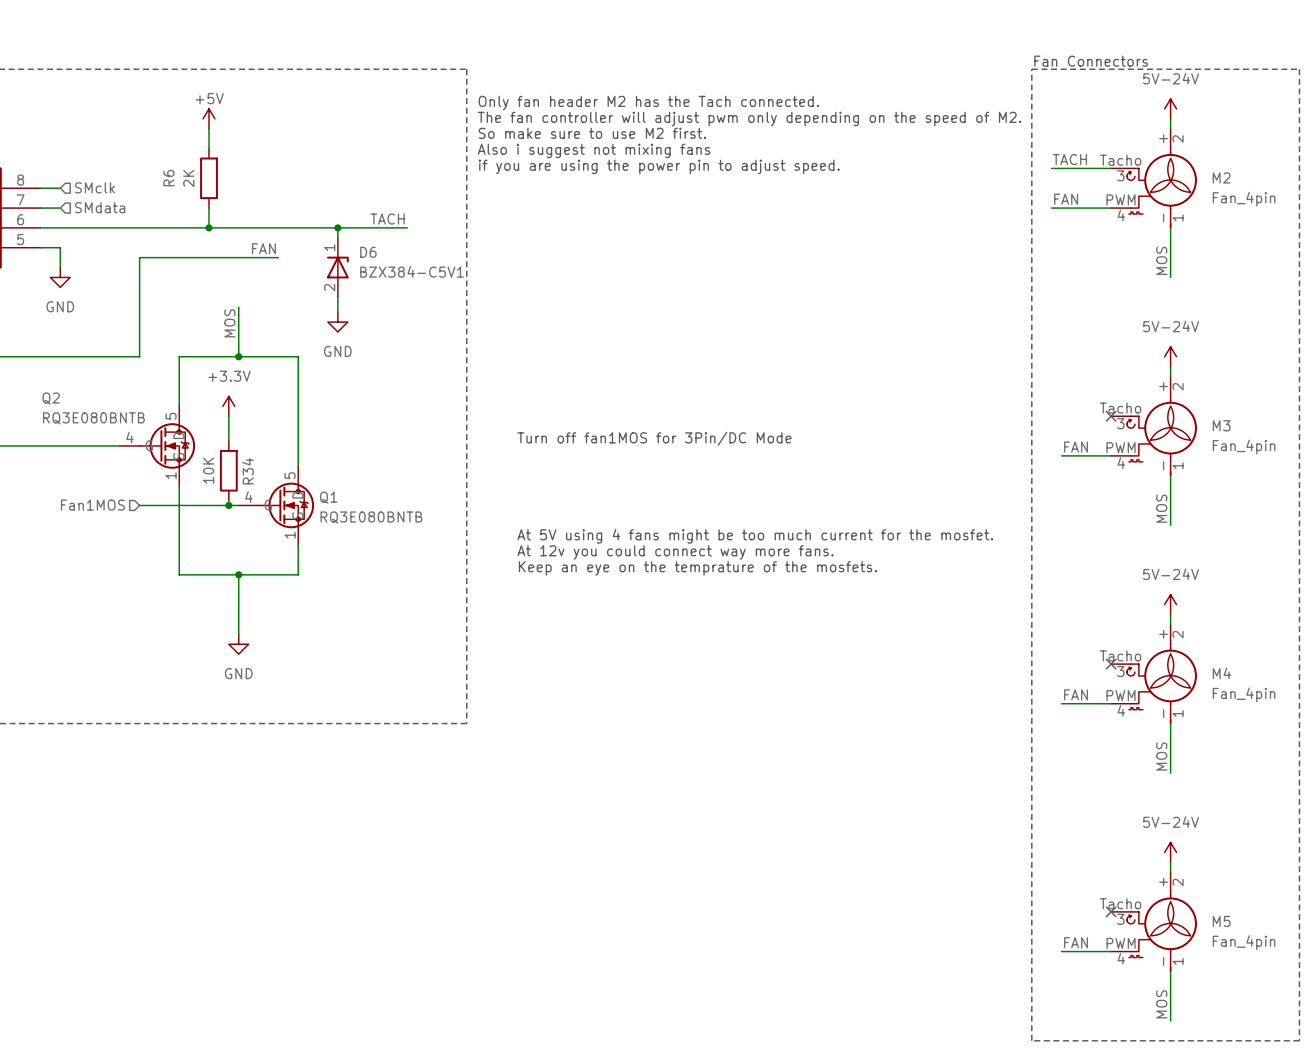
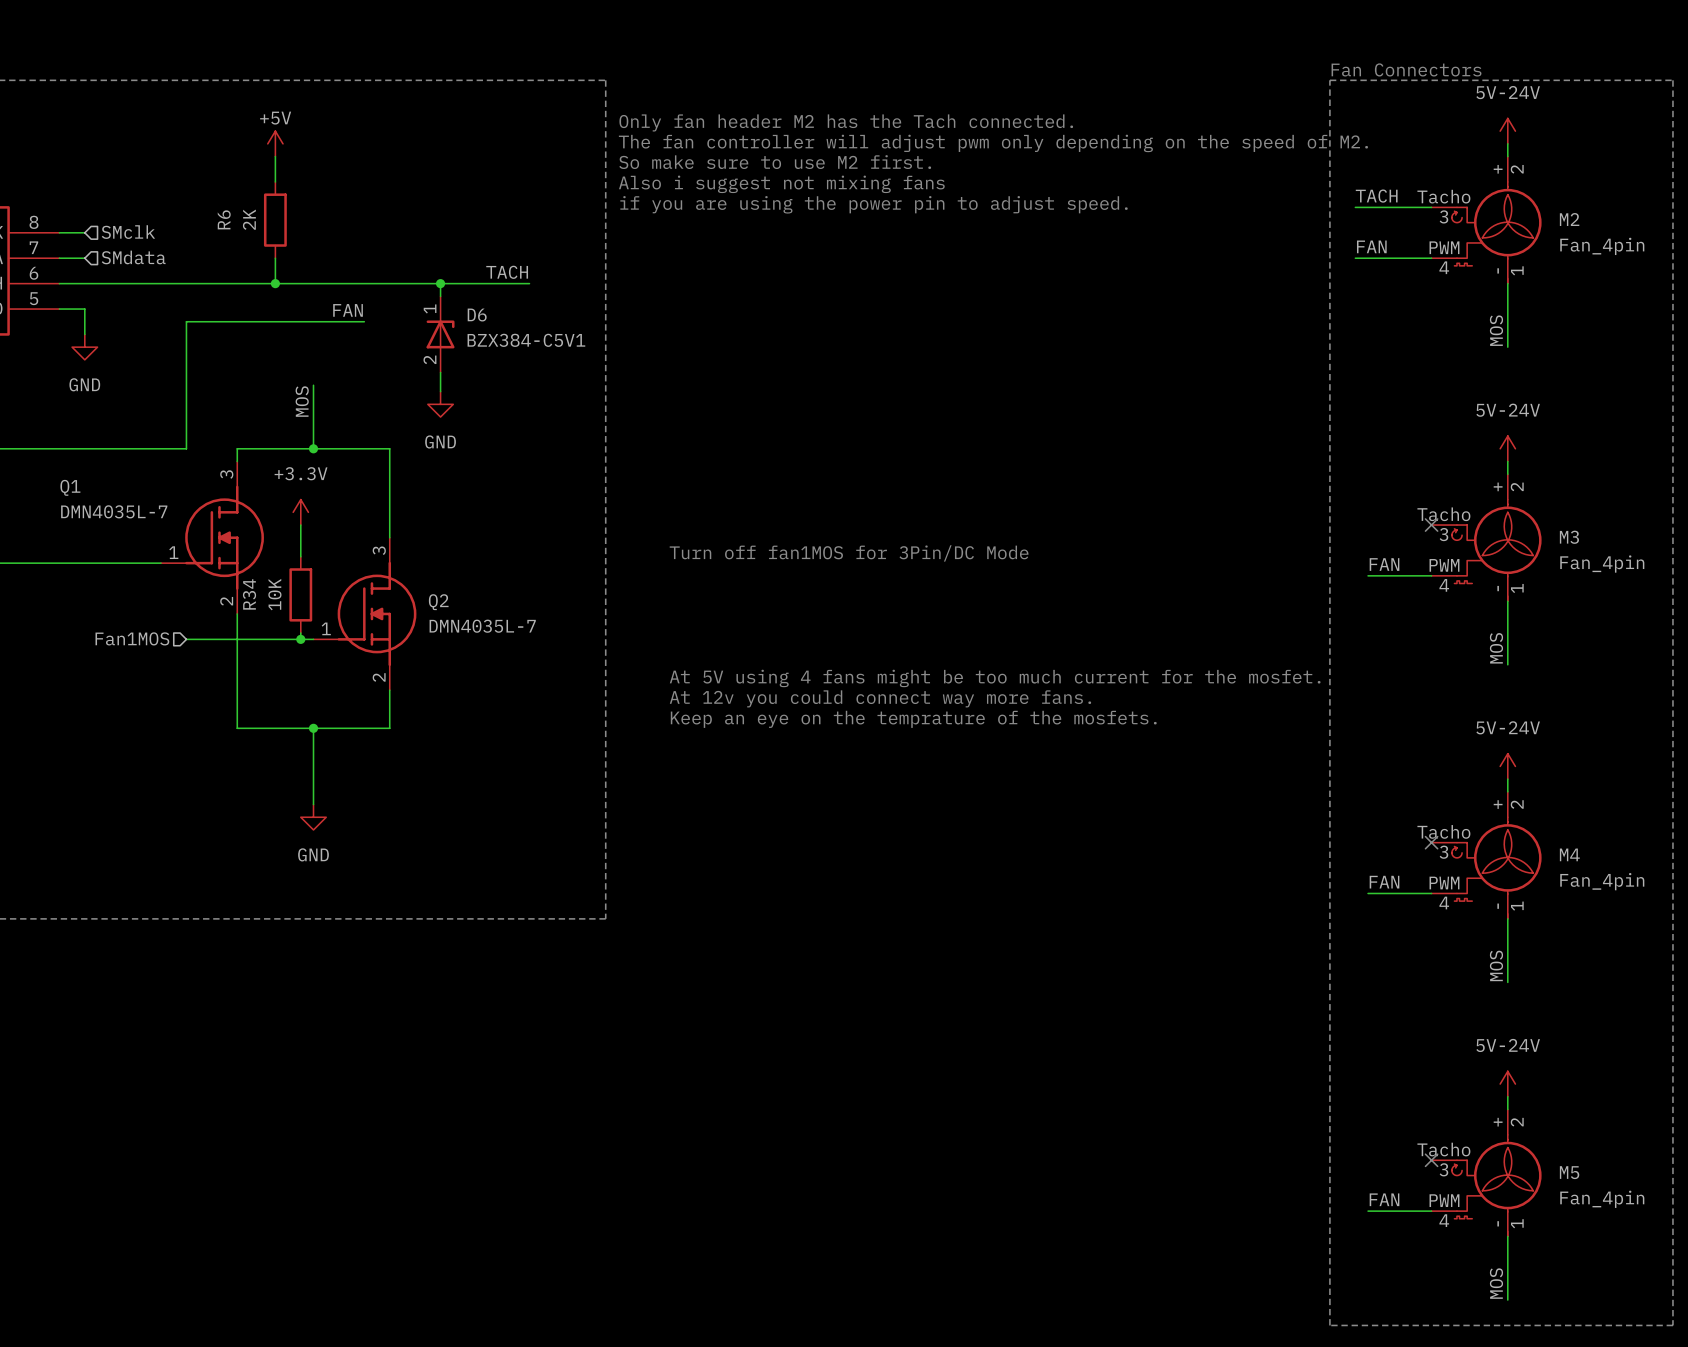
Q2 name position: Q2 (51, 398) -> Q2 (438, 602)
Q2 symbol: [119, 406, 196, 486] -> [313, 537, 417, 691]
Q2 value: RQ3E080BNTB (93, 418) -> DMN4035L-7 (482, 626)
Q1 symbol: [238, 465, 315, 546] -> [161, 461, 264, 614]
R34 name position: R34 (248, 471) -> R34 (249, 594)
Q1 name position: Q1 (328, 497) -> Q1 (70, 487)
Q1 value: RQ3E080BNTB (371, 517) -> DMN4035L-7 (114, 511)

